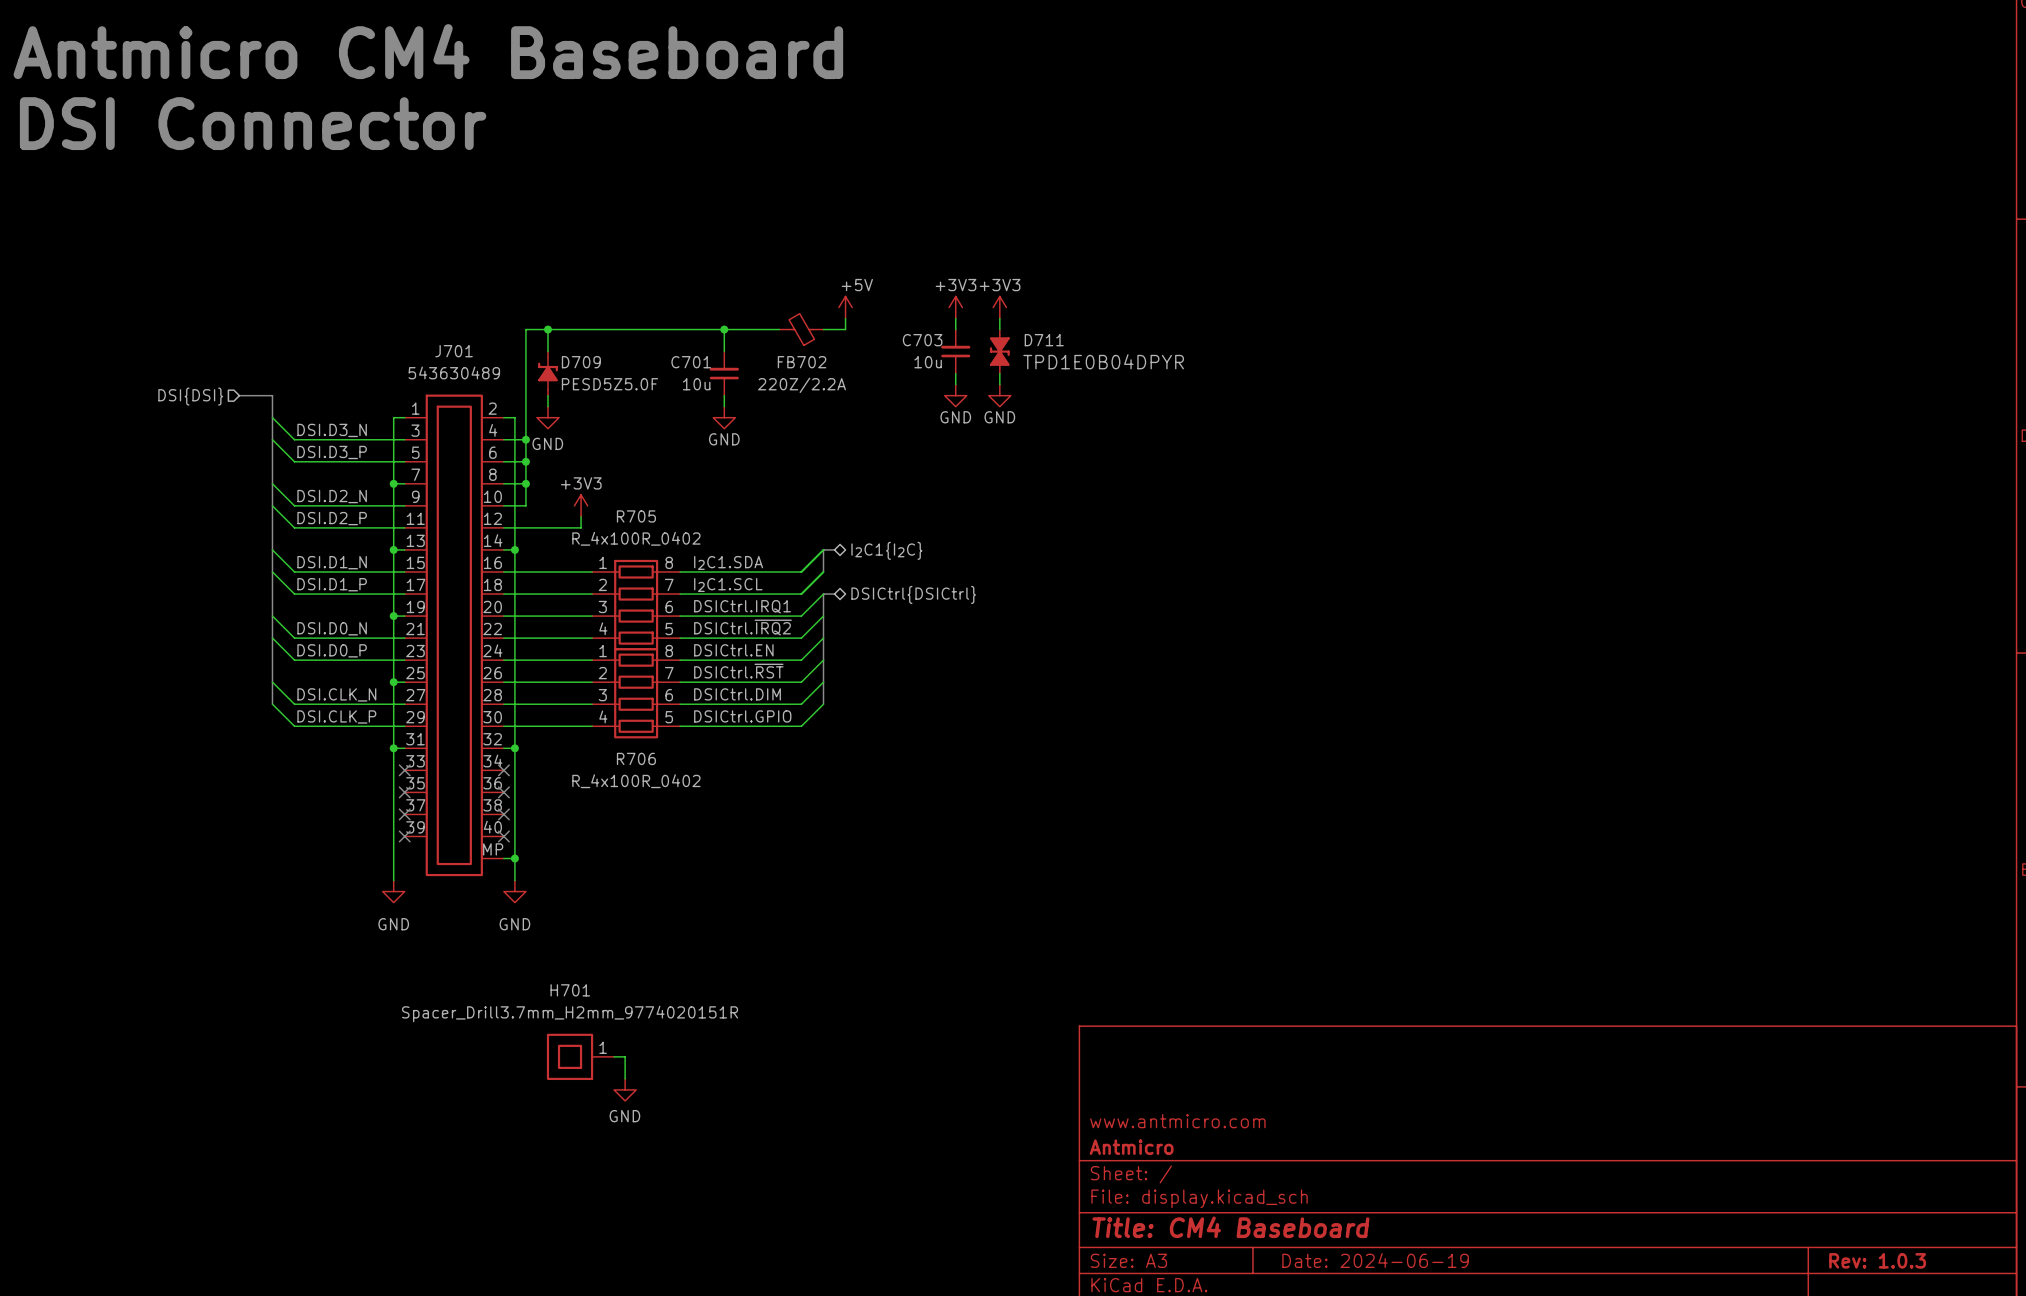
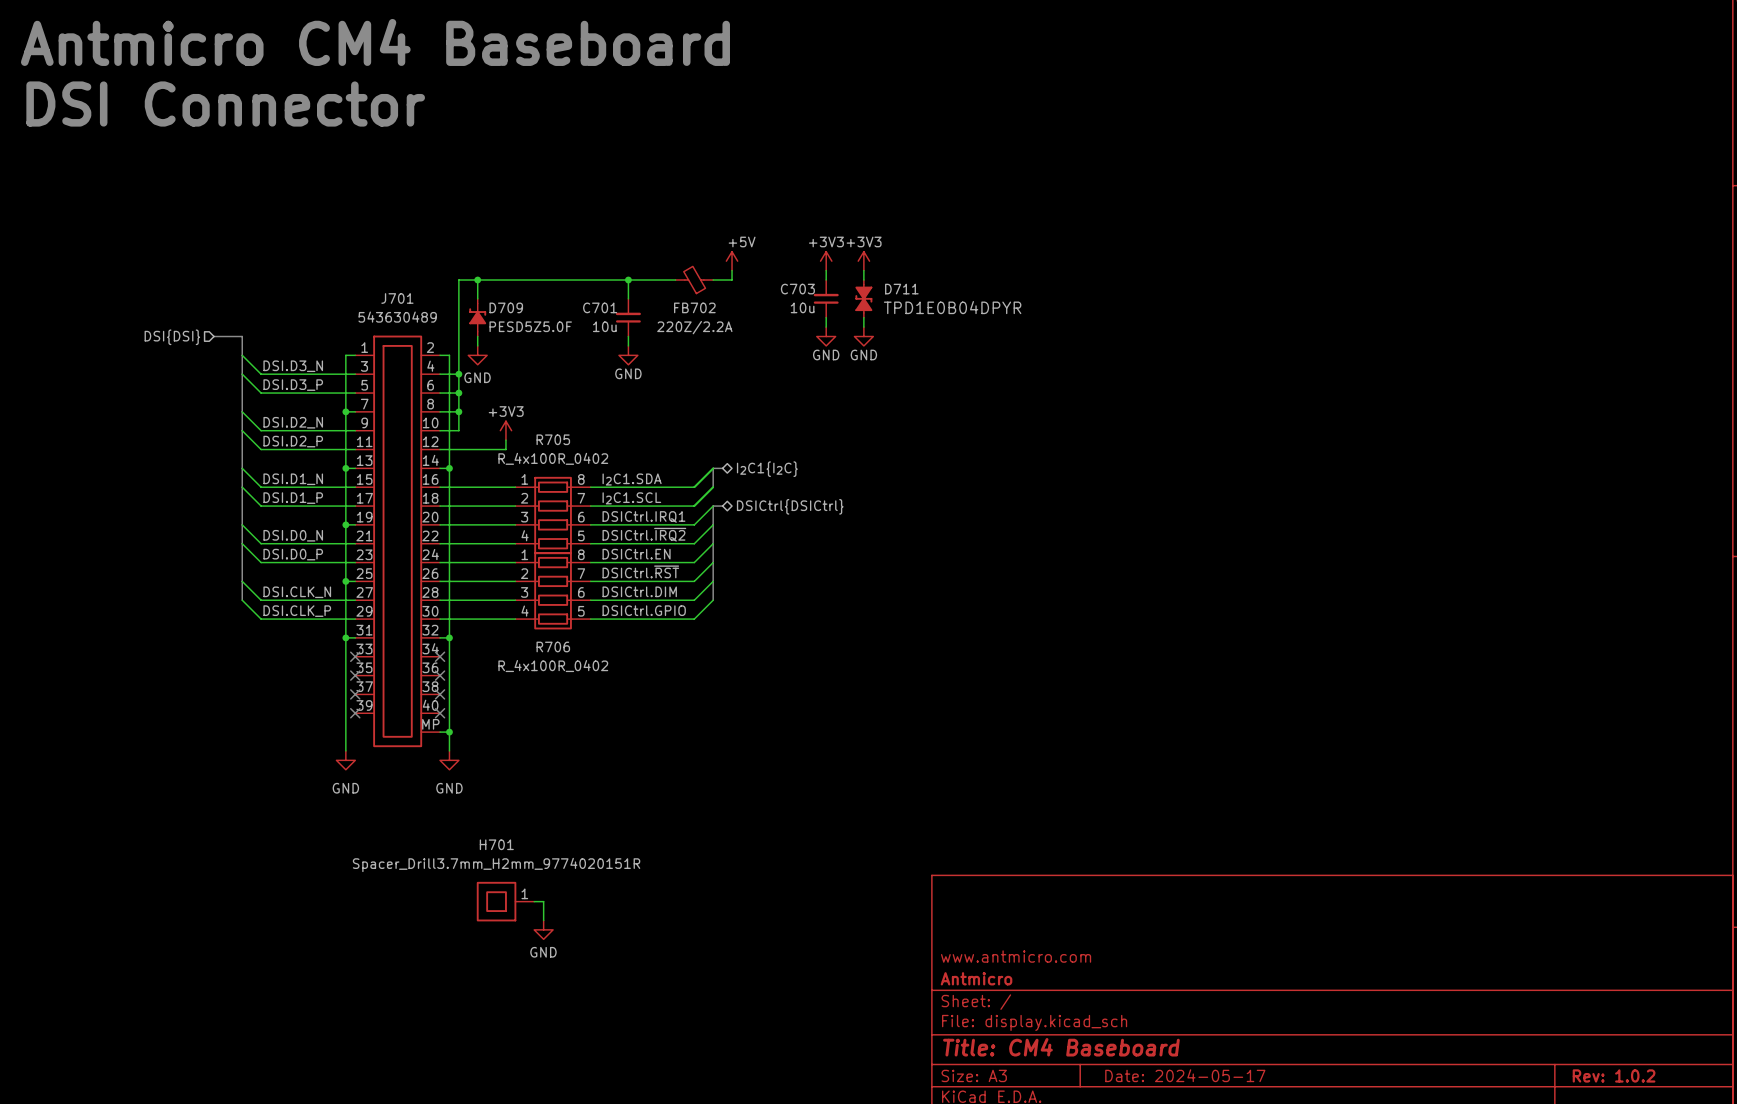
title block: Date: 2024-06-19 (1375, 1260) -> Date: 2024-05-17 (1185, 1075)
title block: Rev: 1.0.3 (1877, 1260) -> Rev: 1.0.2 (1614, 1075)

